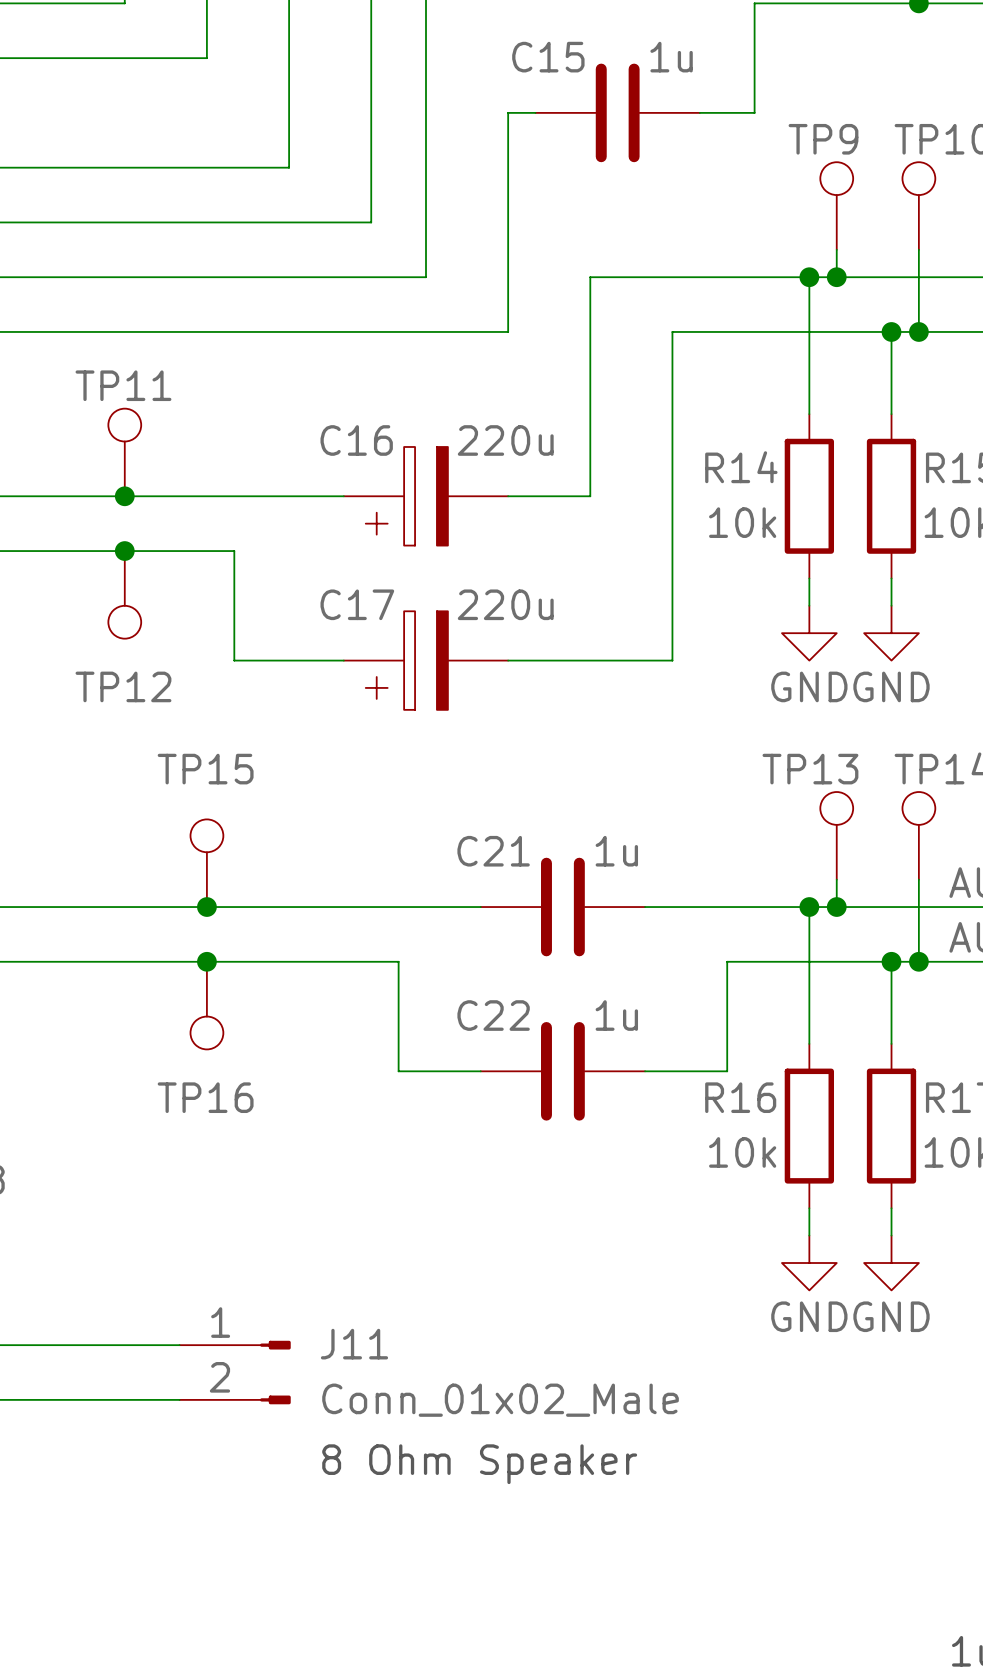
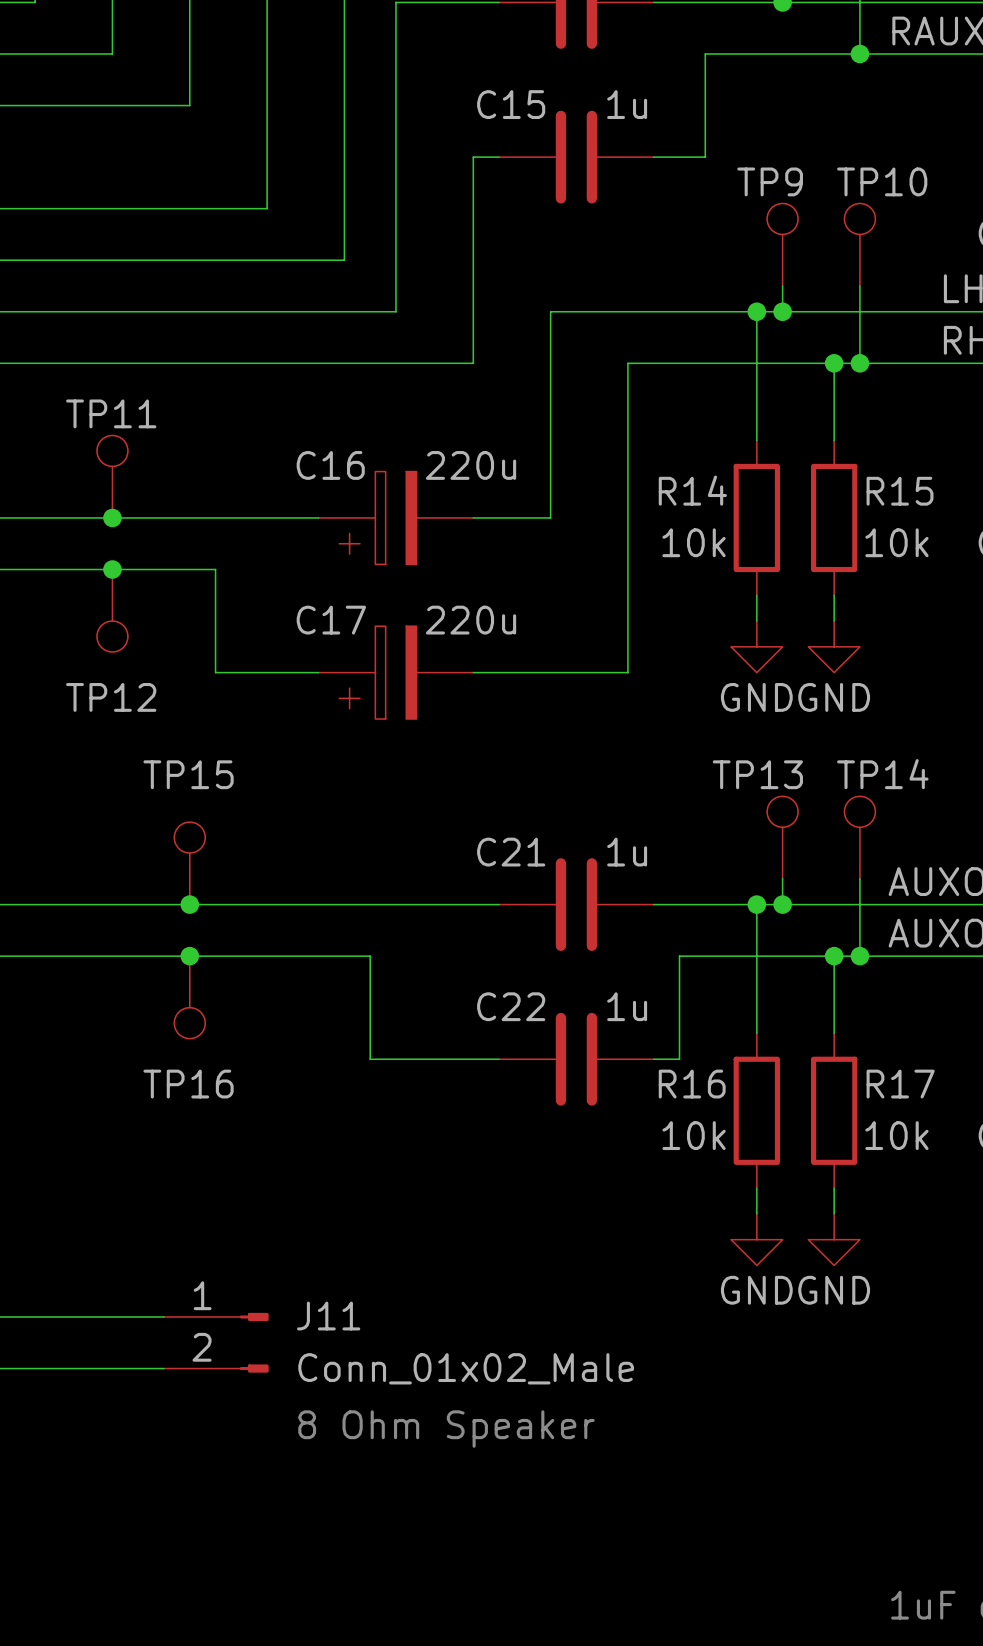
C21 position: (562, 907) -> (576, 904)
C22 position: (562, 1071) -> (576, 1059)

